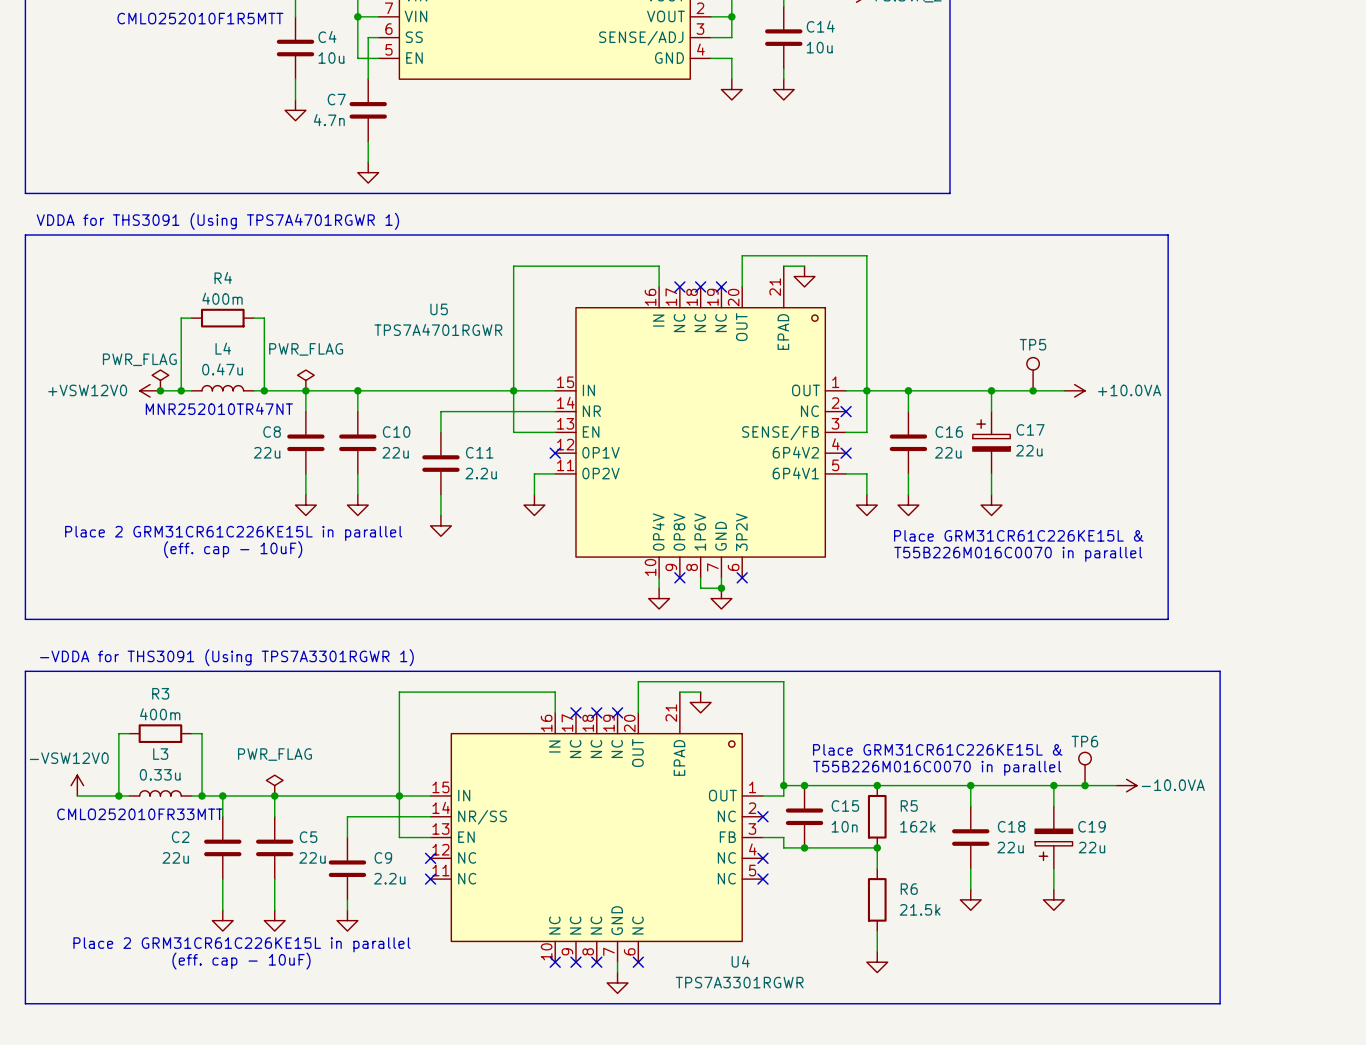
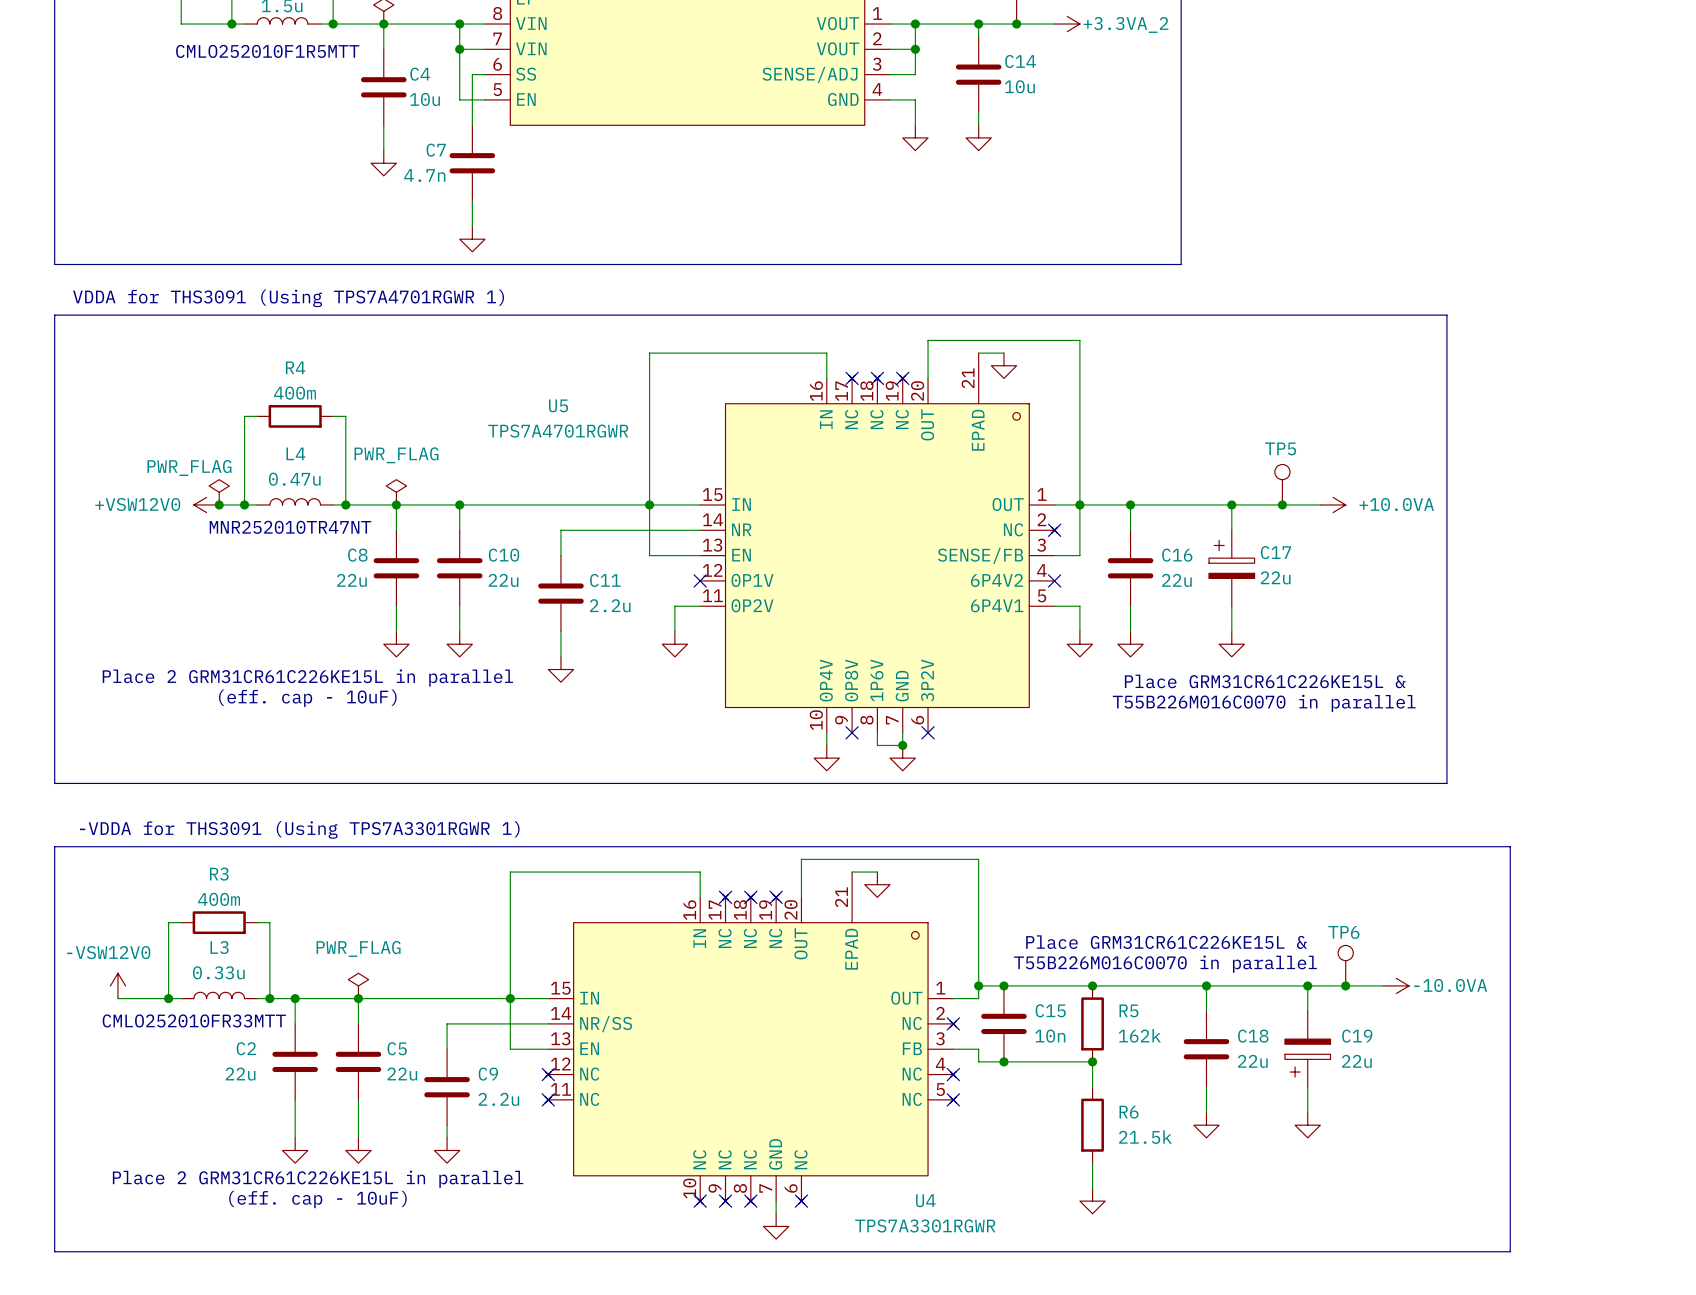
U5 symbol: [555, 266, 847, 578] -> [700, 353, 1058, 733]
U4 symbol: [430, 692, 763, 963] -> [545, 872, 957, 1205]

